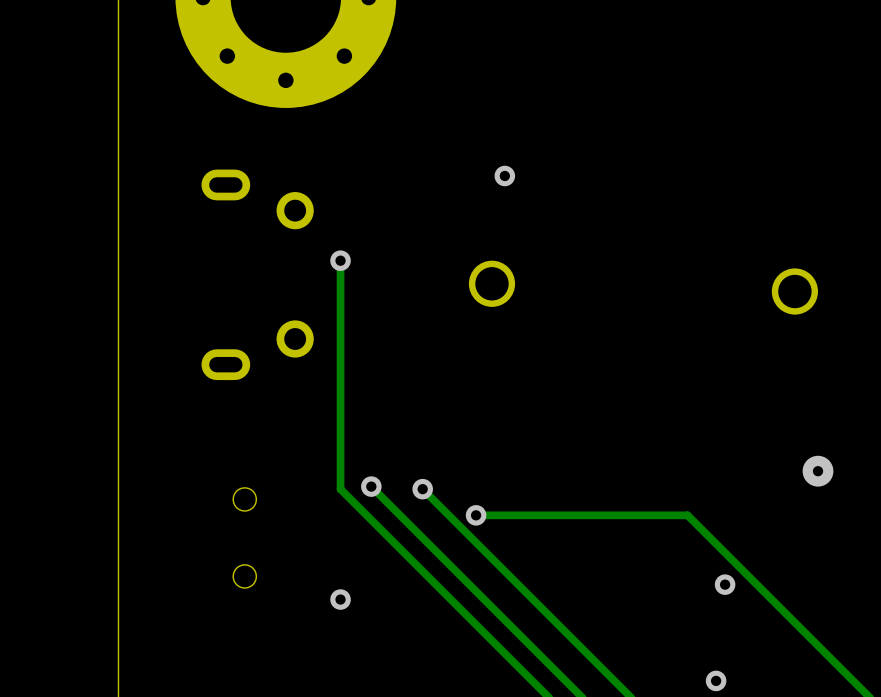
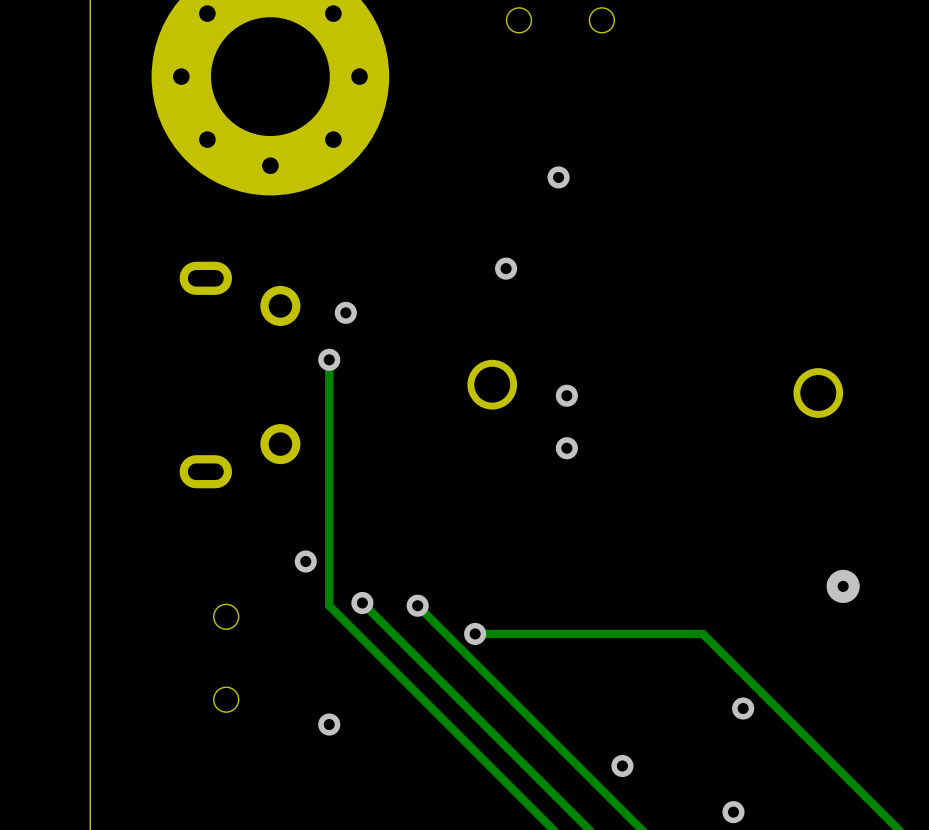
via: none -> (558, 177)
via: none -> (345, 312)
via: none -> (566, 395)
via: none -> (566, 448)
via: none -> (305, 561)
via: none -> (622, 765)

